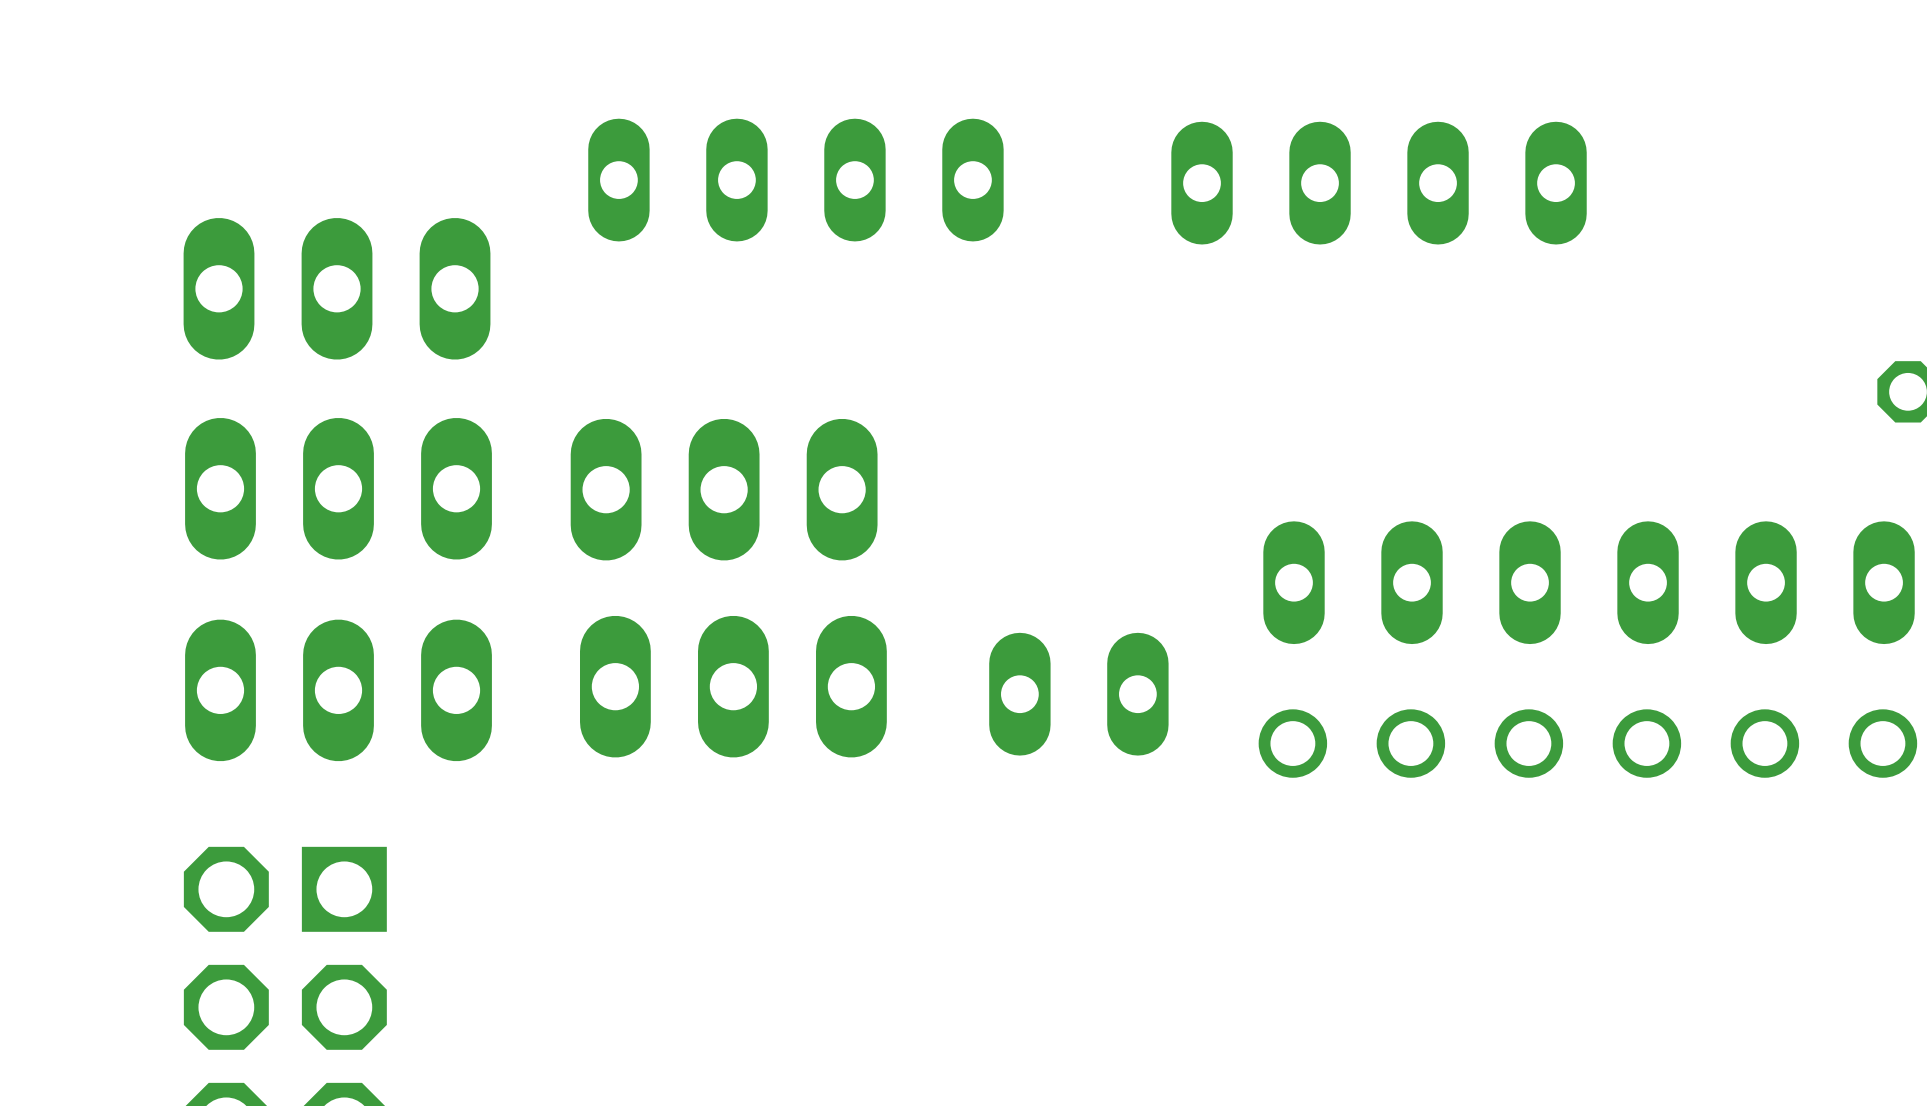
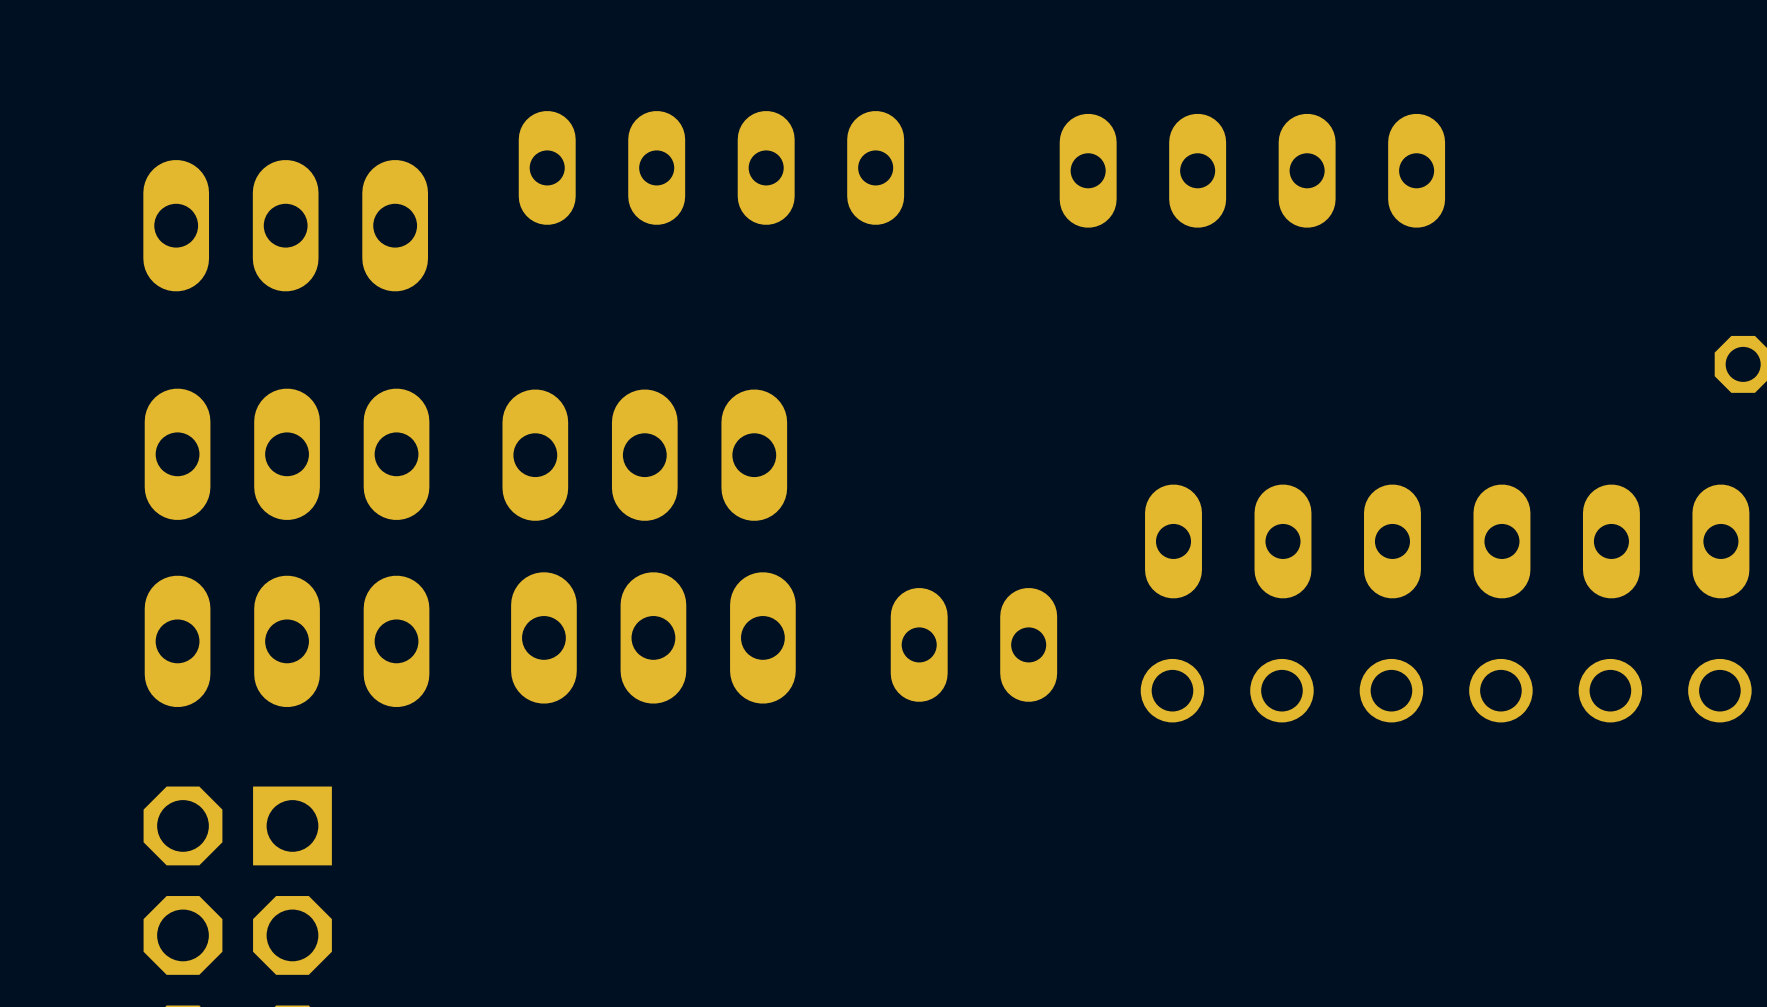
part position: (337, 288) -> (285, 225)

